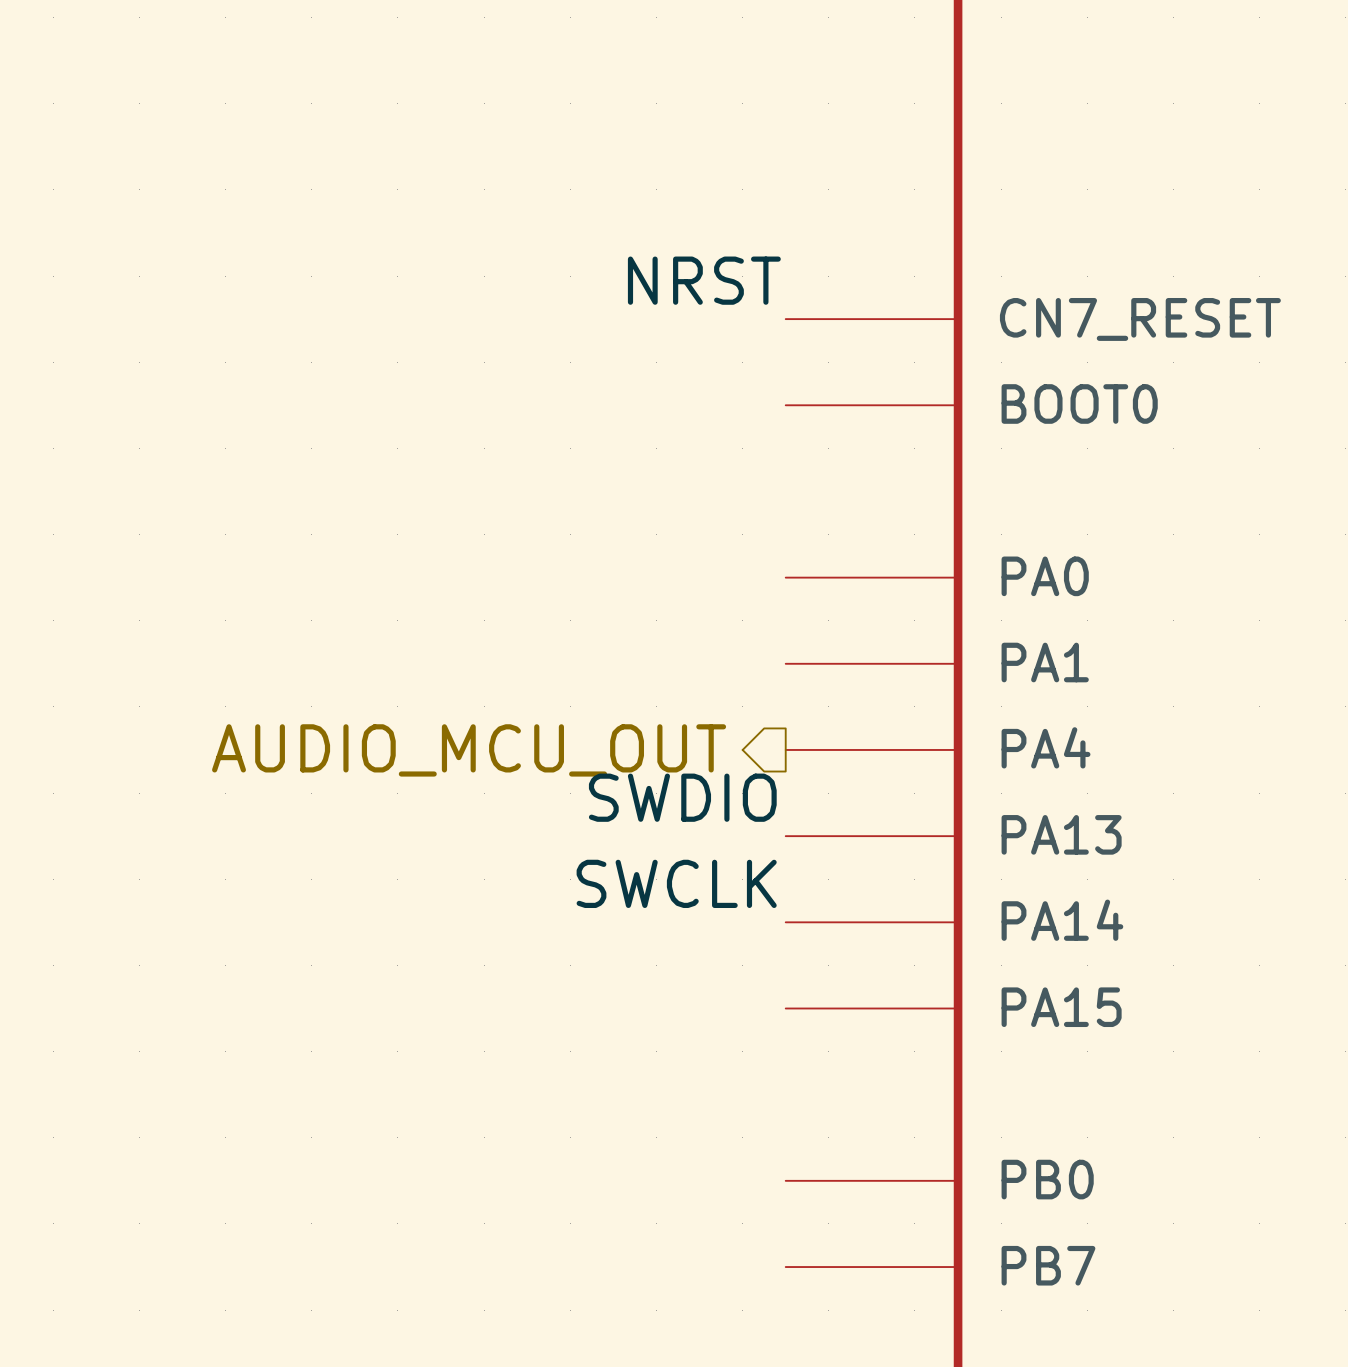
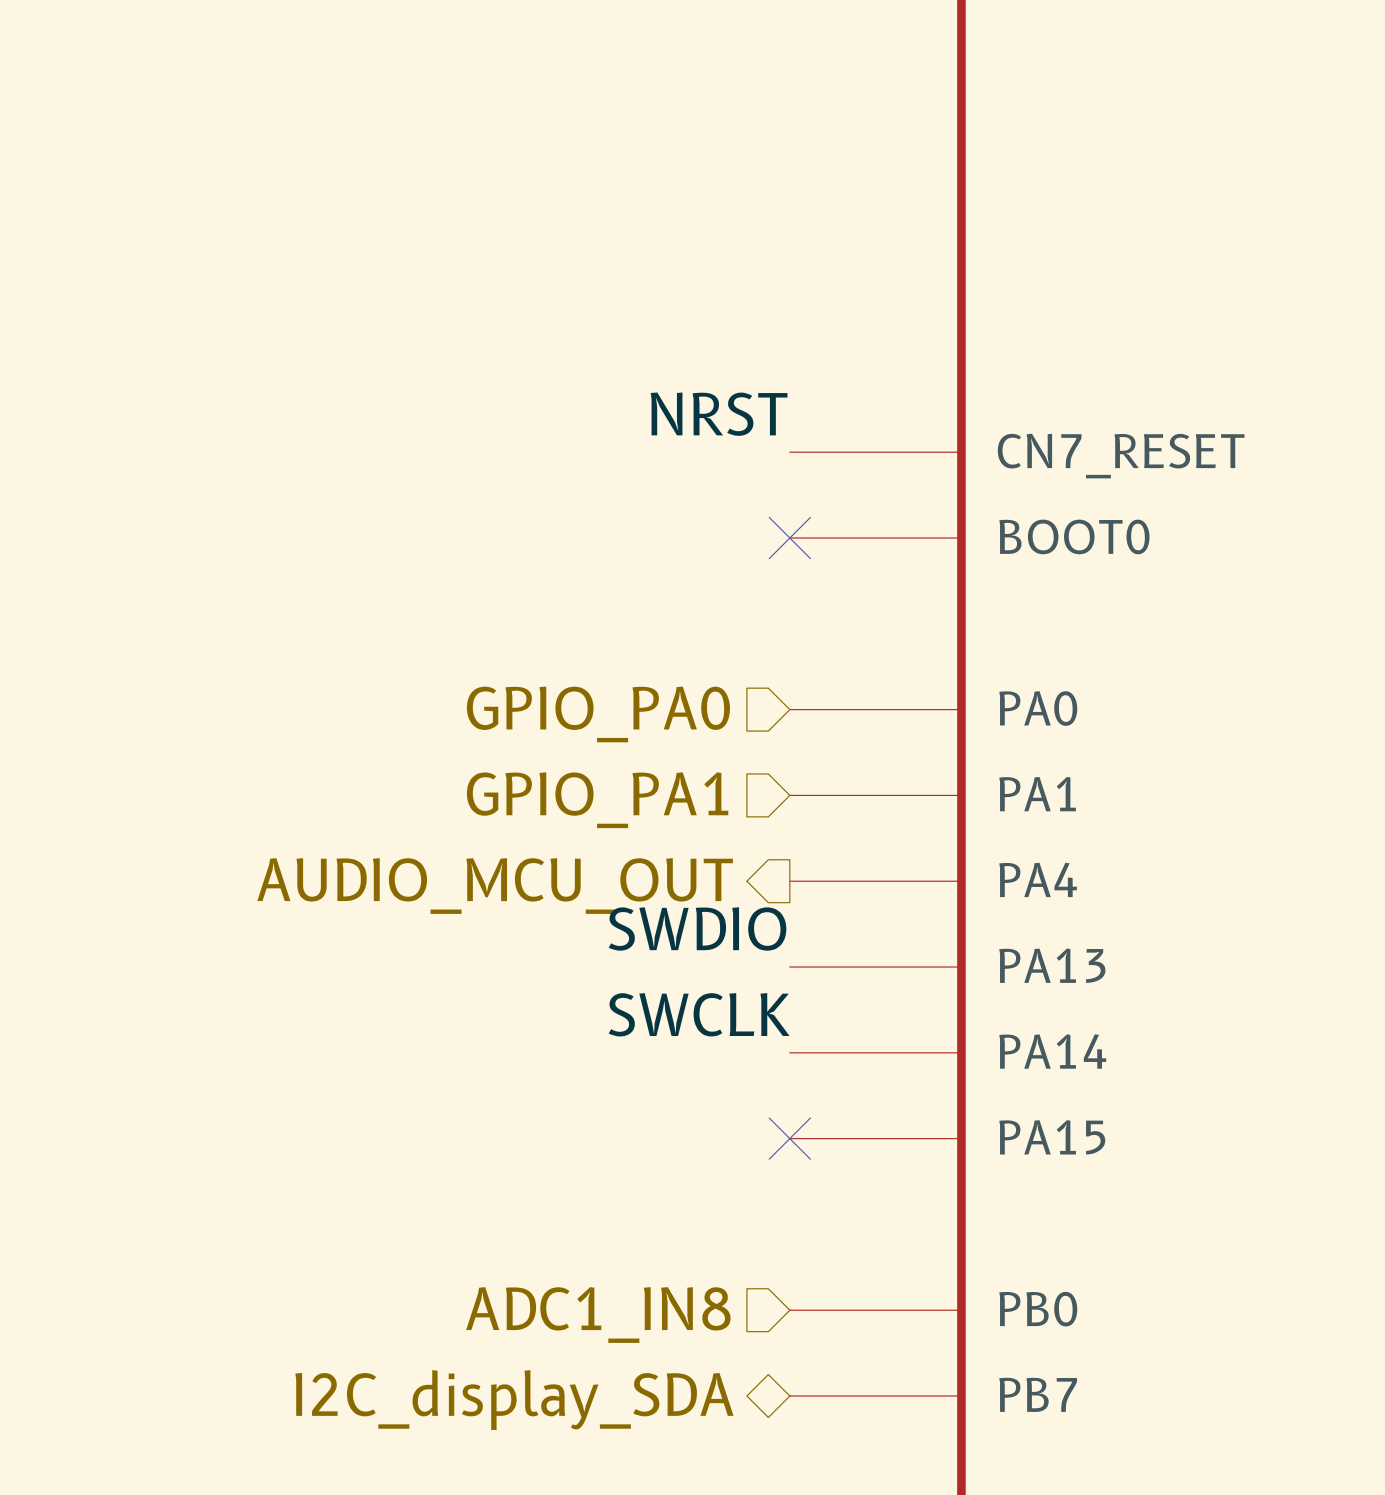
no-connect mark: none -> (789, 538)
hierarchical label: none -> GPIO_PA0 (598, 714)
hierarchical label: none -> GPIO_PA1 (597, 800)
no-connect mark: none -> (789, 1138)
hierarchical label: none -> ADC1_IN8 (598, 1315)
hierarchical label: none -> I2C_display_SDA (514, 1400)

